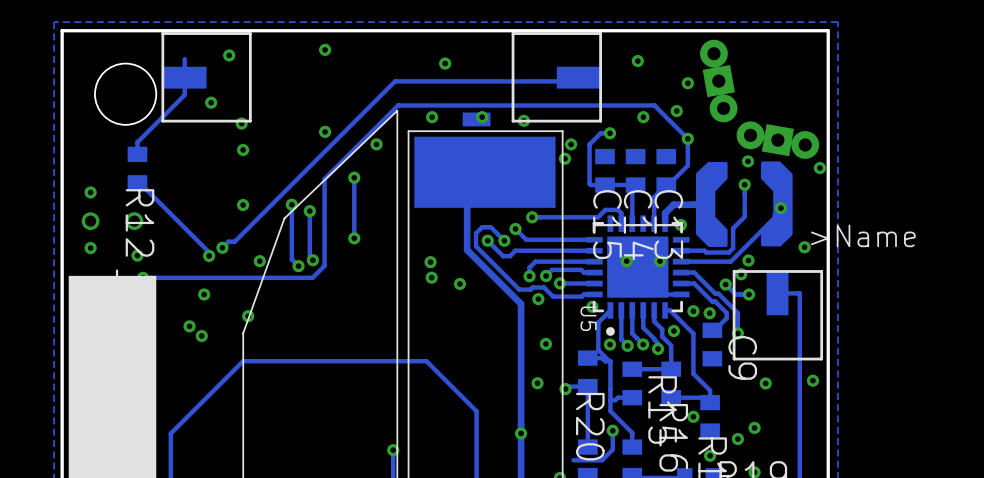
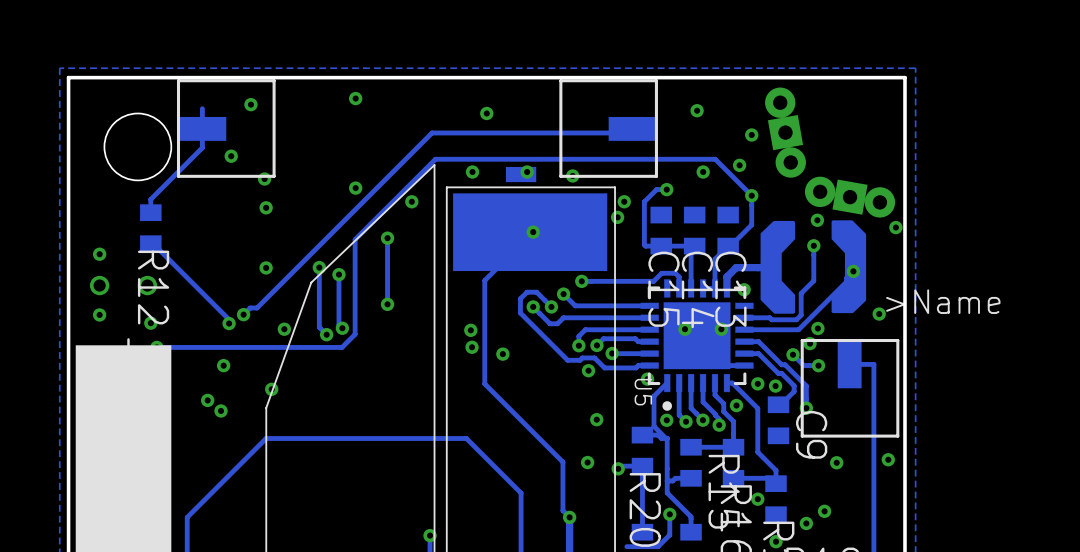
track: (484, 172) (467, 190) (467, 250) (521, 303) (521, 433) -> (533, 232) (484, 280) (484, 384) (562, 462) (562, 510) (569, 517)
via: none -> (533, 232)

